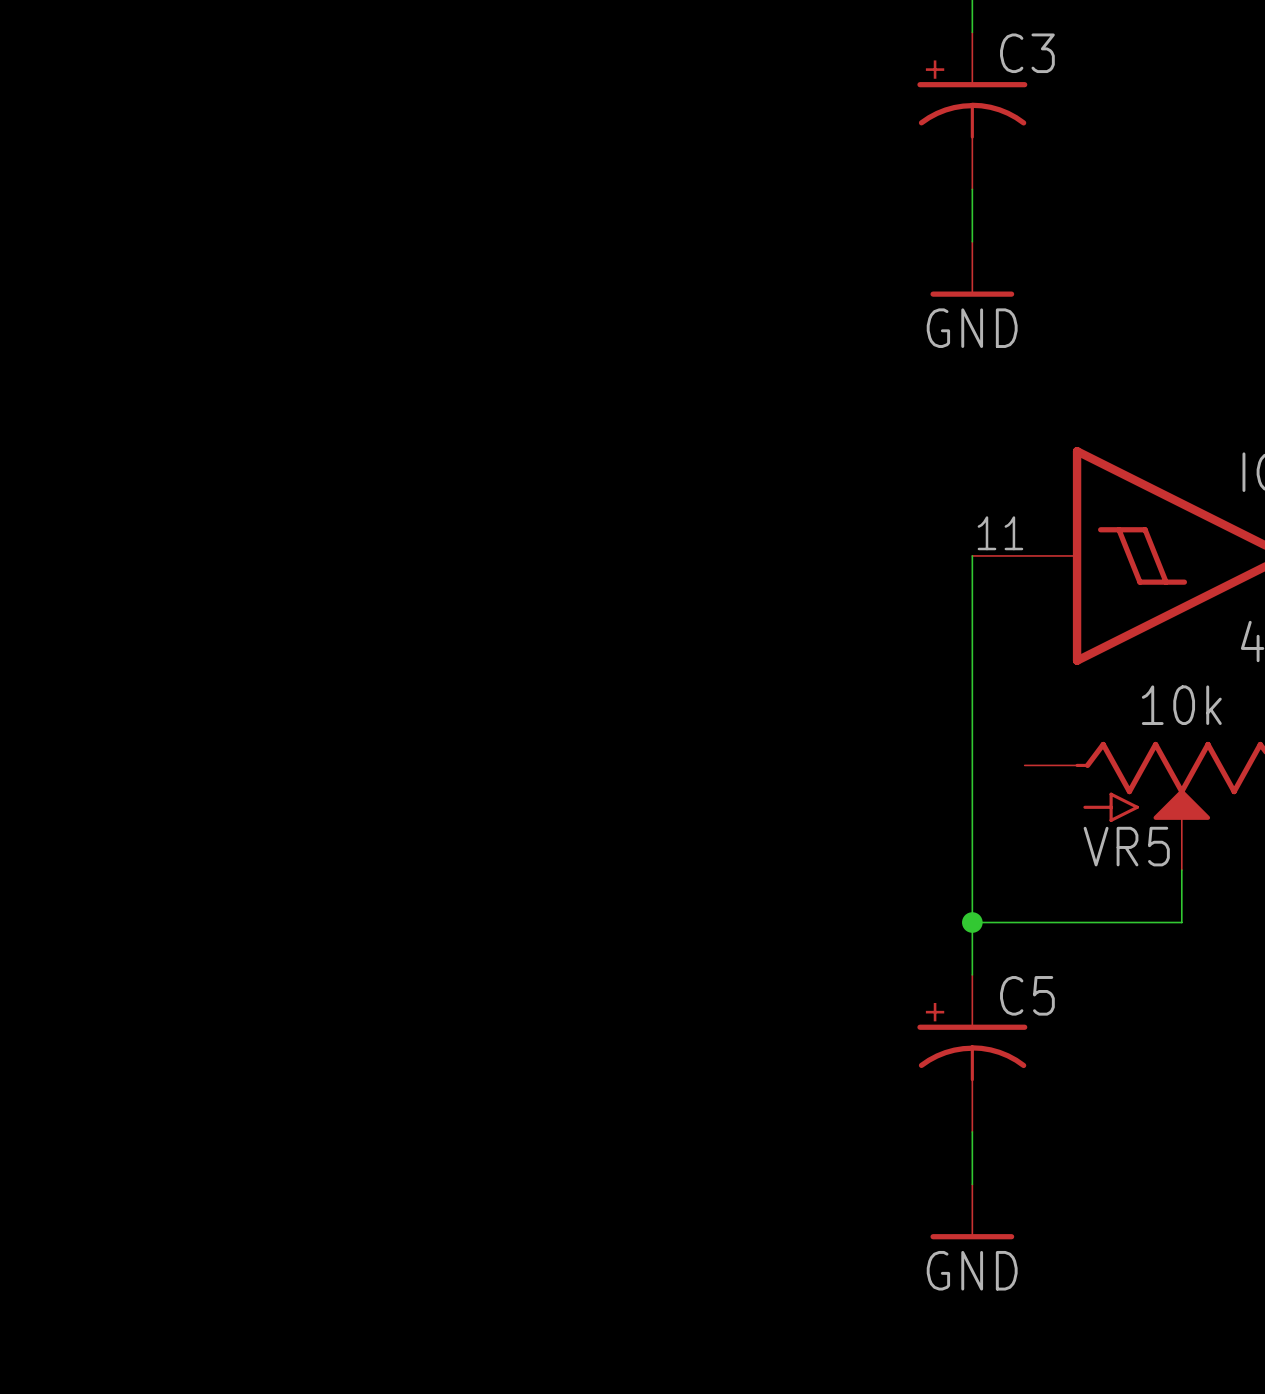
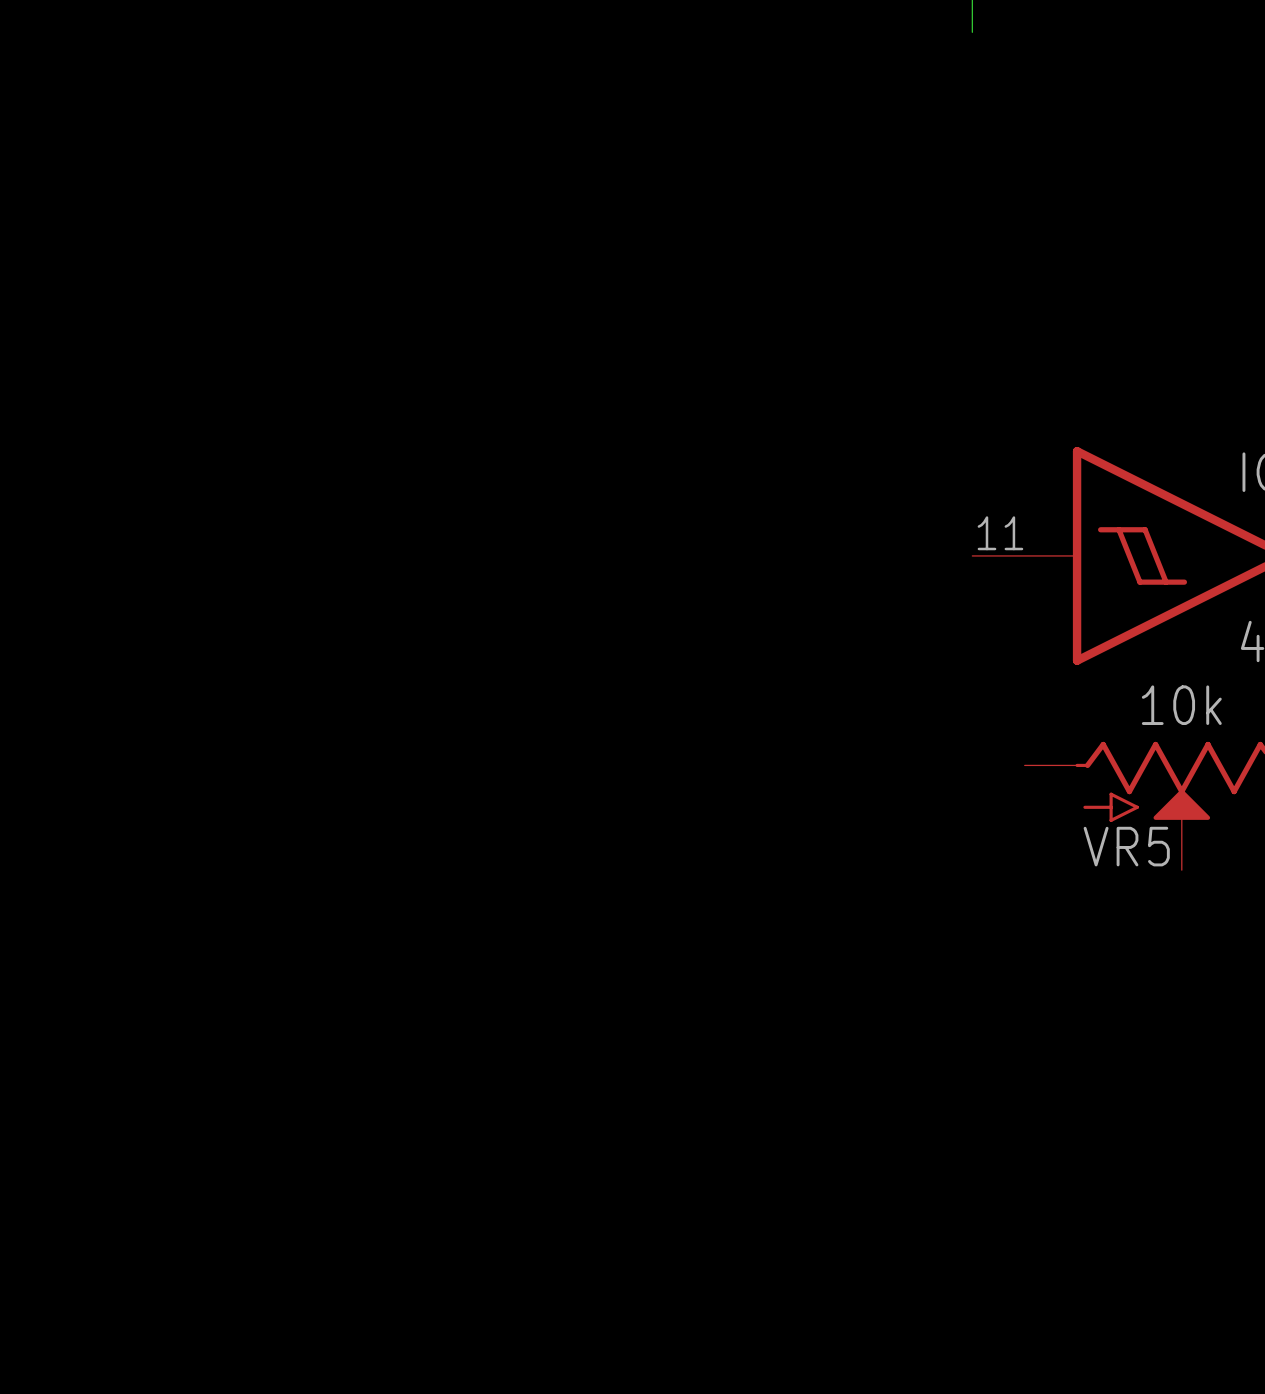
C3: (972, 110) -> none
wire: (972, 189) (972, 241) -> none
power symbol: GND (972, 269) -> none
wire: (972, 555) (972, 974) -> none
wire: (1181, 870) (1181, 922) (972, 922) -> none
junction: (972, 922) -> none
C5: (972, 1053) -> none
wire: (972, 1131) (972, 1184) -> none
power symbol: GND (972, 1211) -> none

